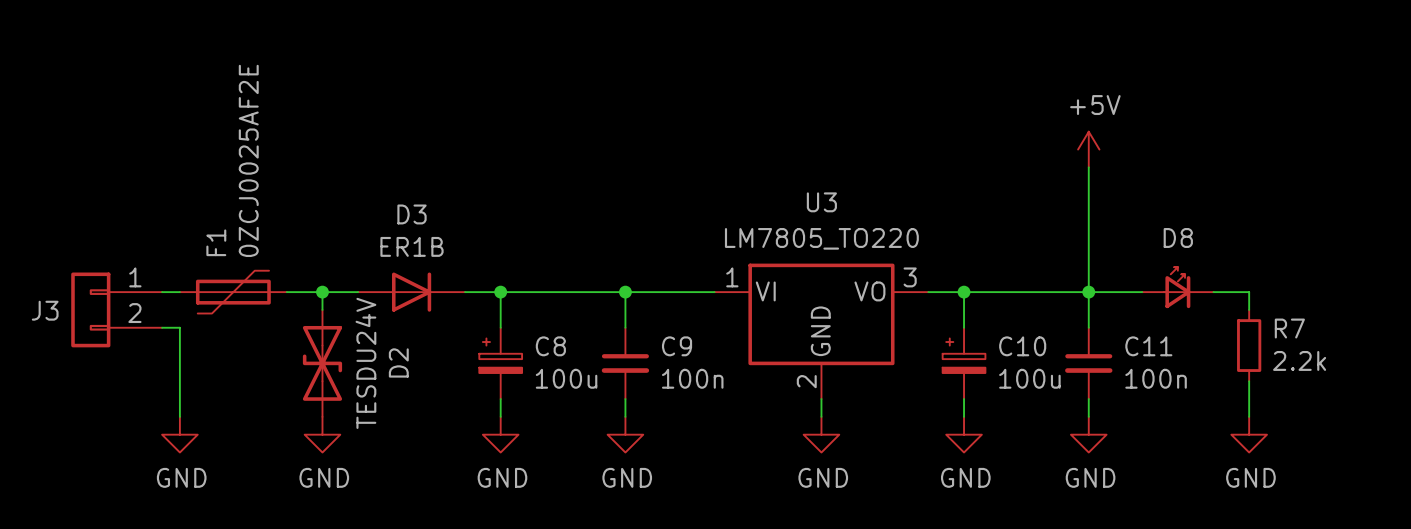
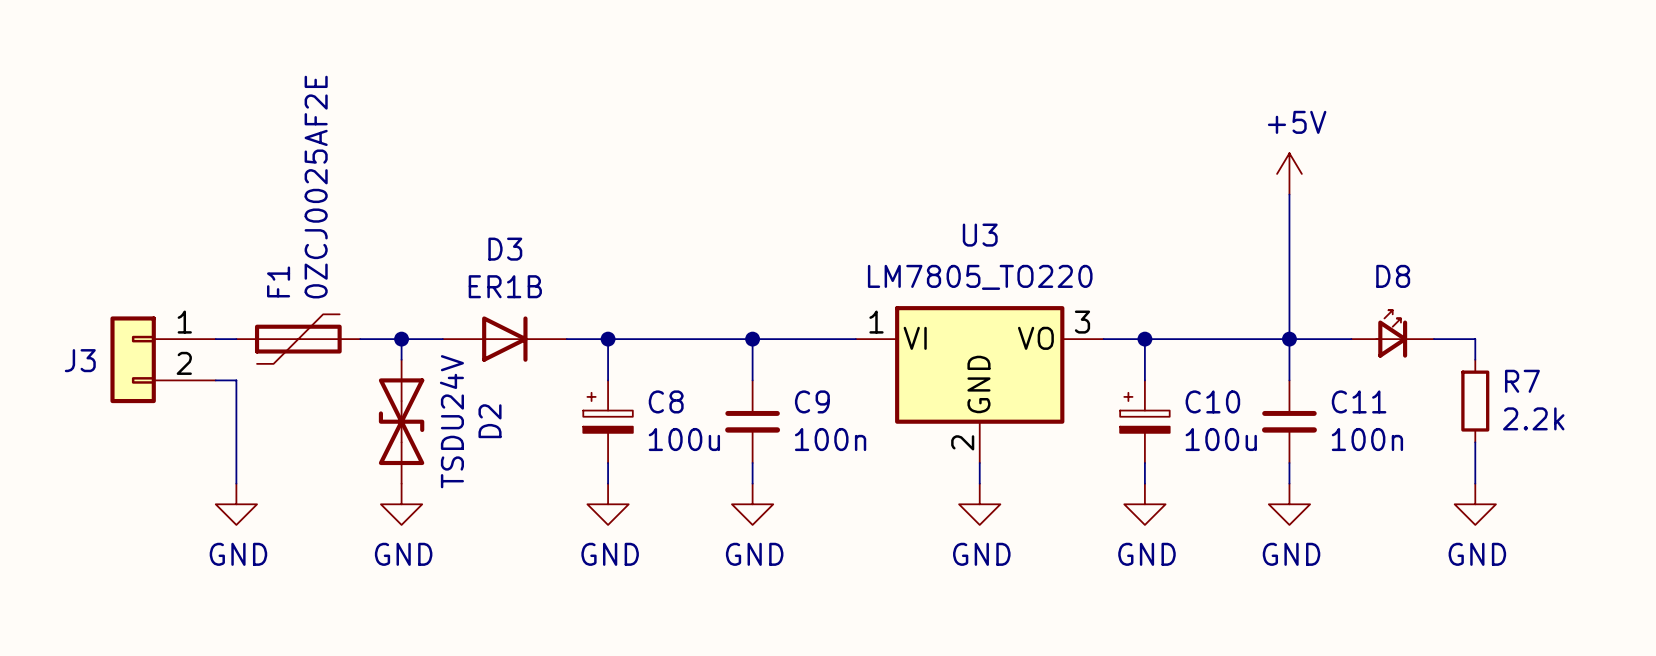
D2 value: TESDU24V (365, 363) -> TSDU24V (451, 421)

